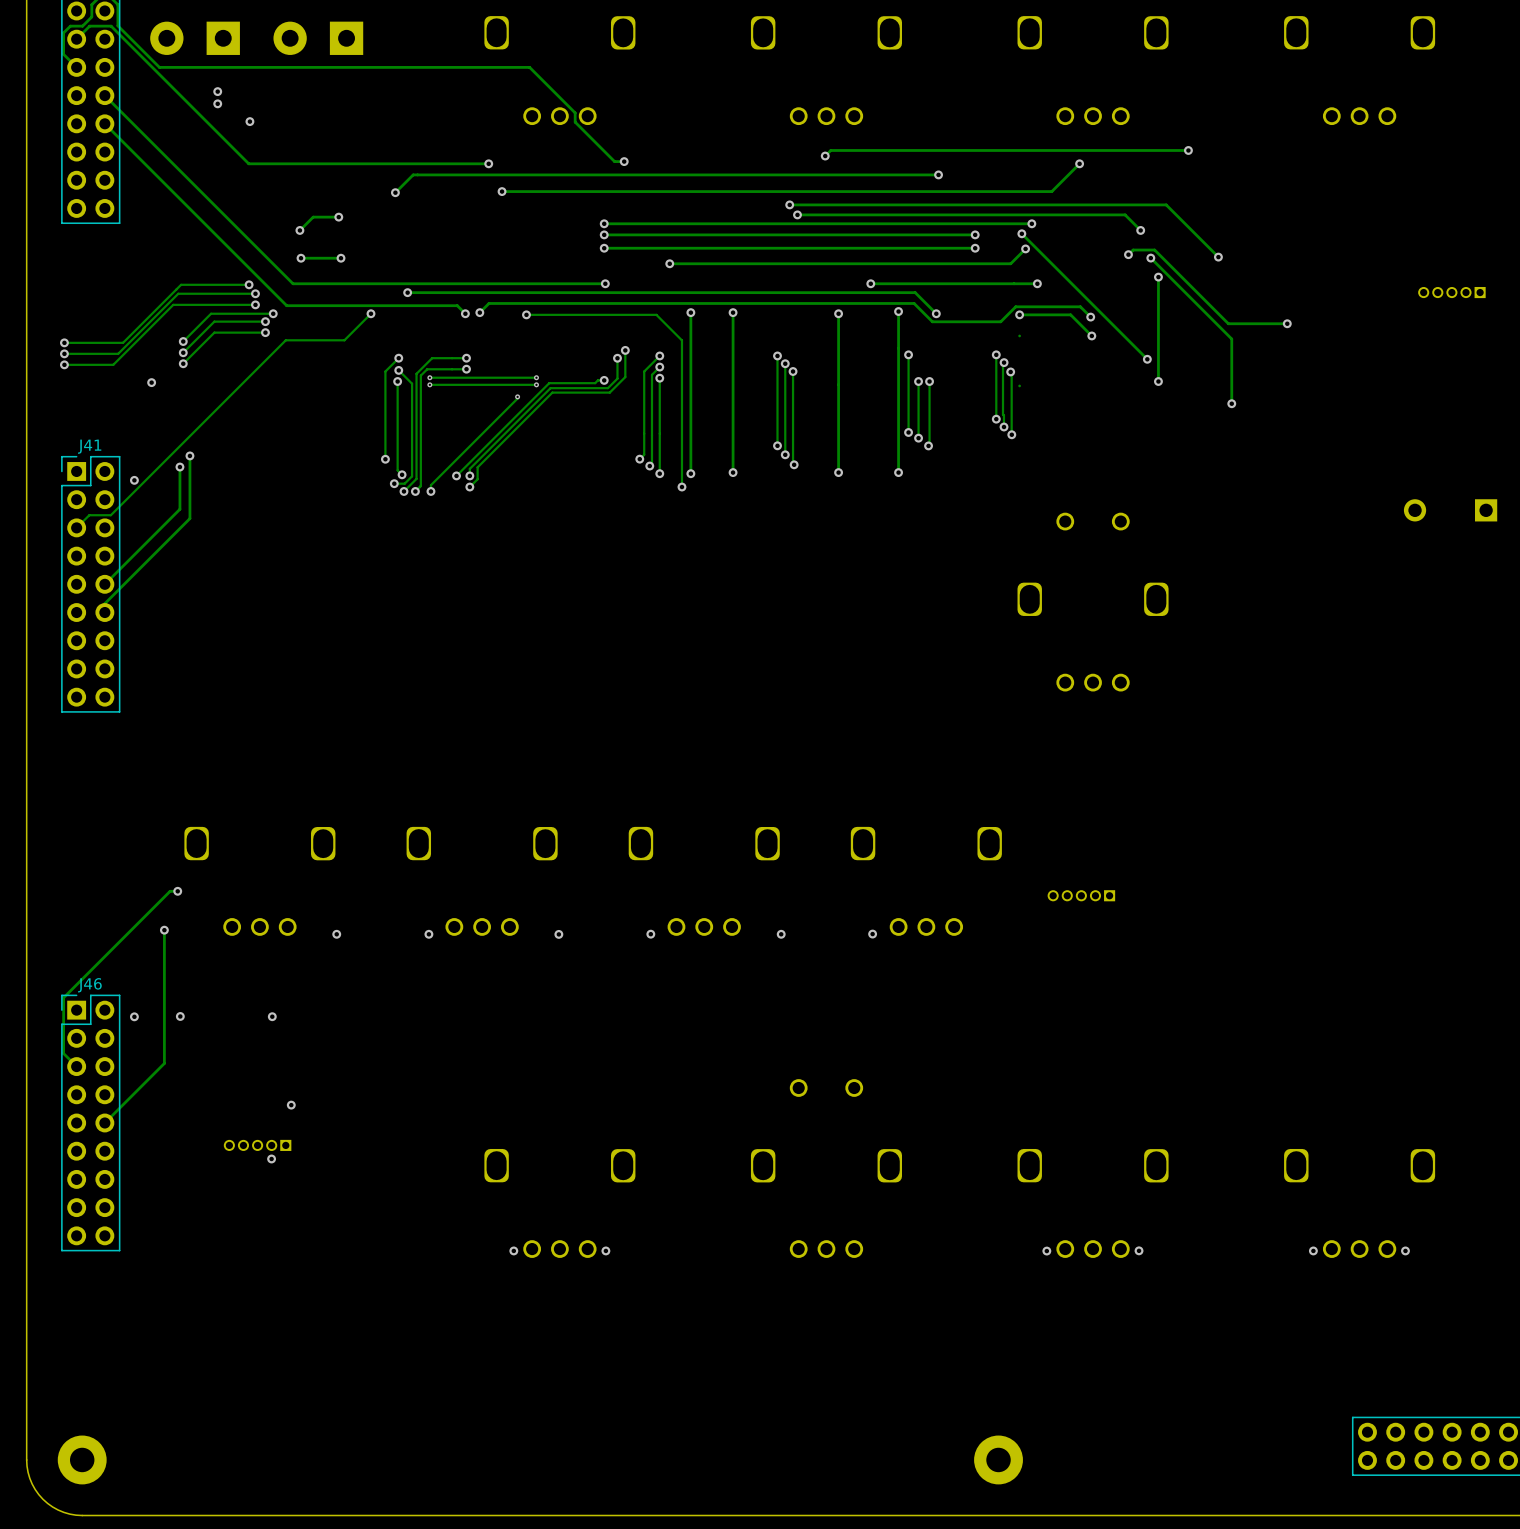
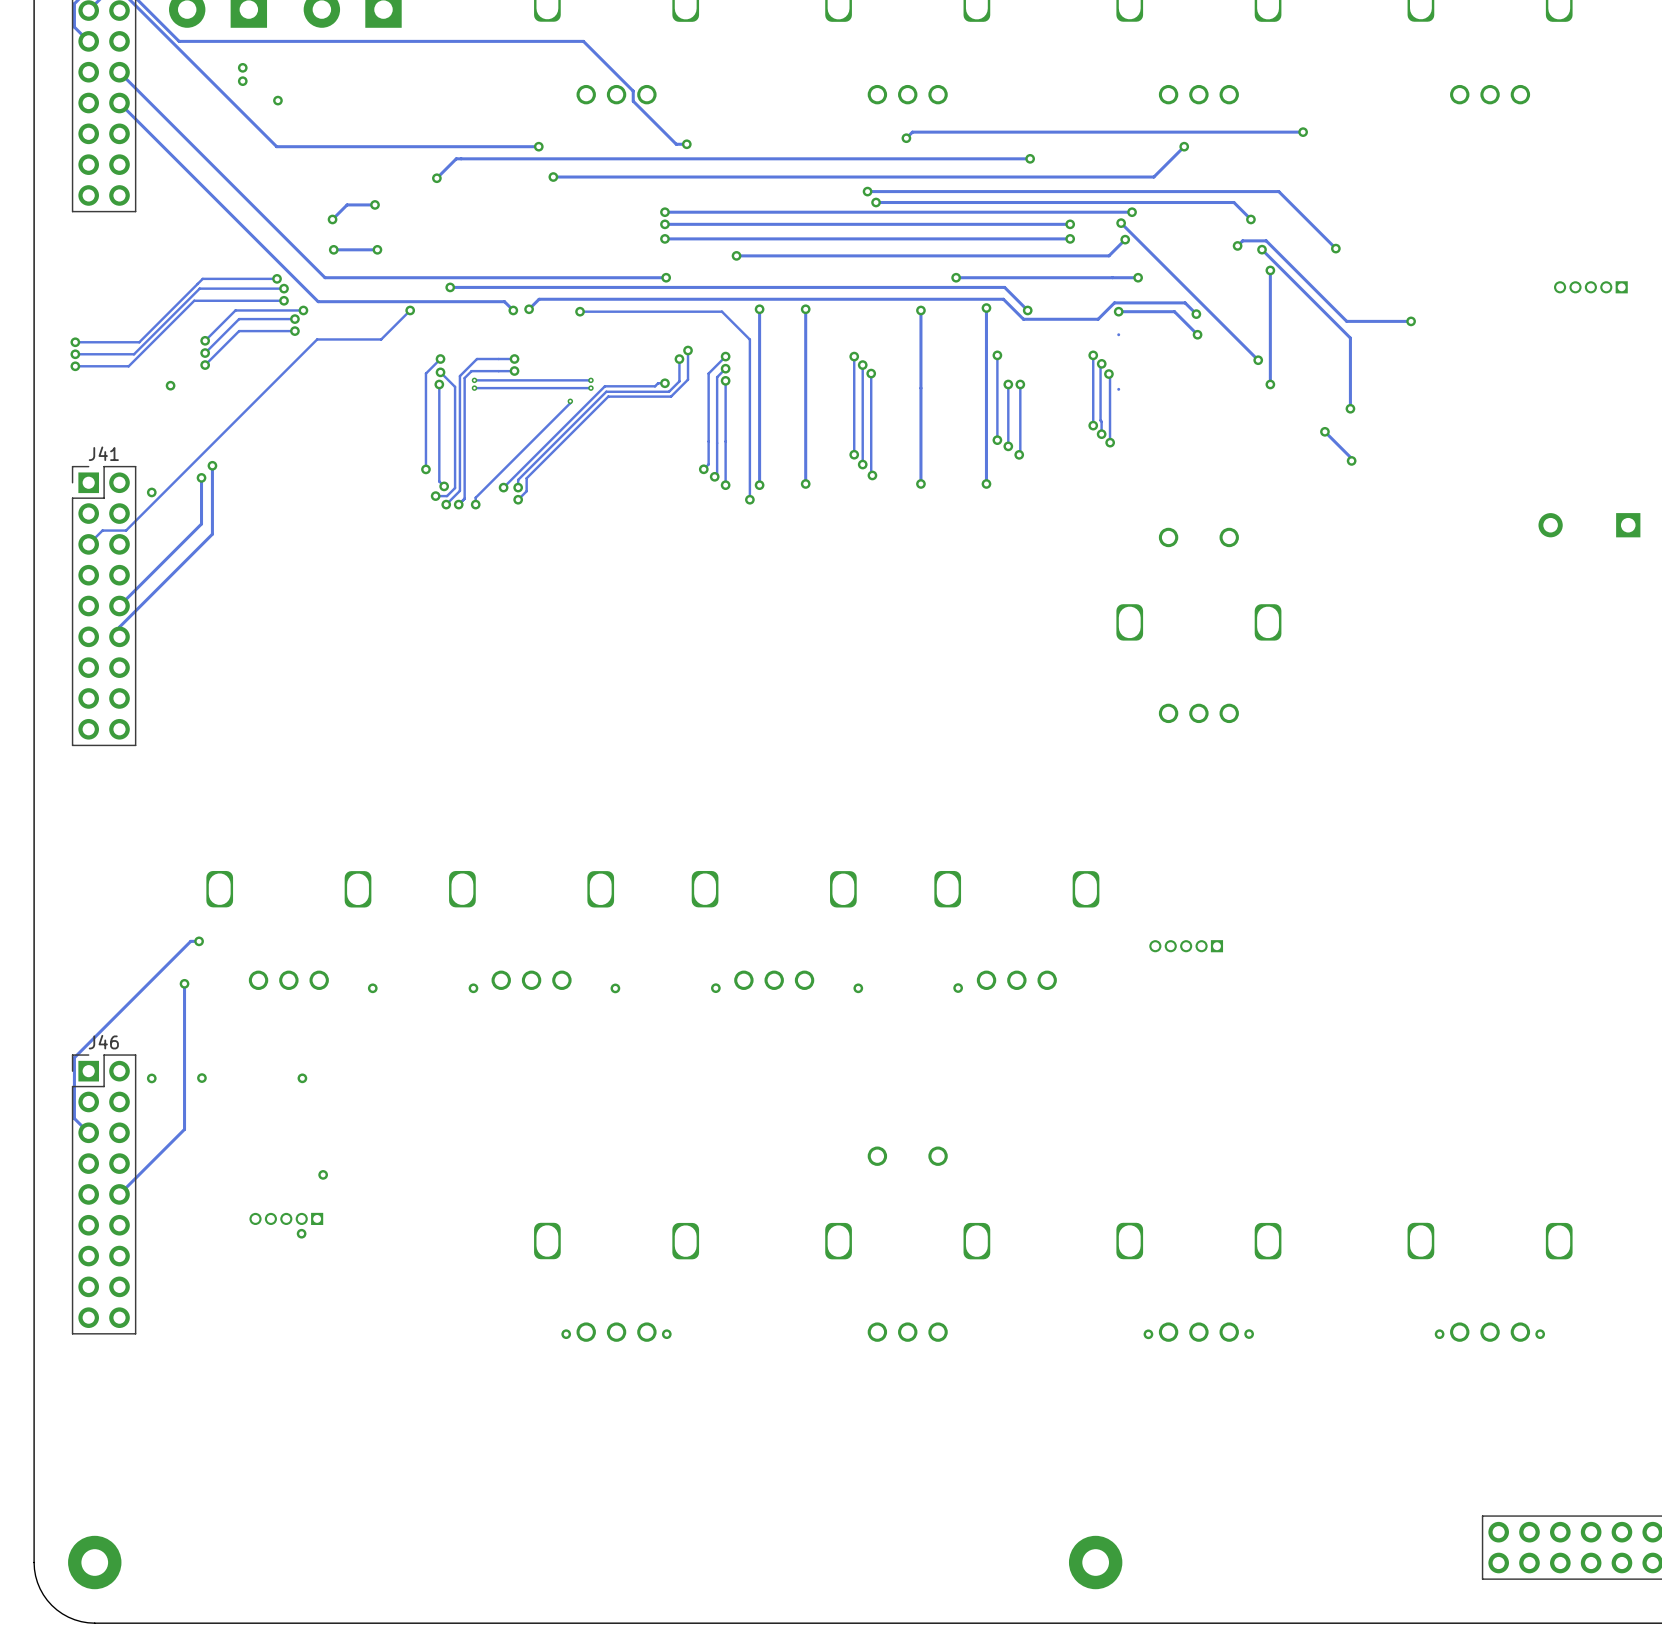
track: none -> (1324, 431) (1351, 458) (1351, 460)
via: none -> (1324, 431)
via: none -> (1351, 460)

